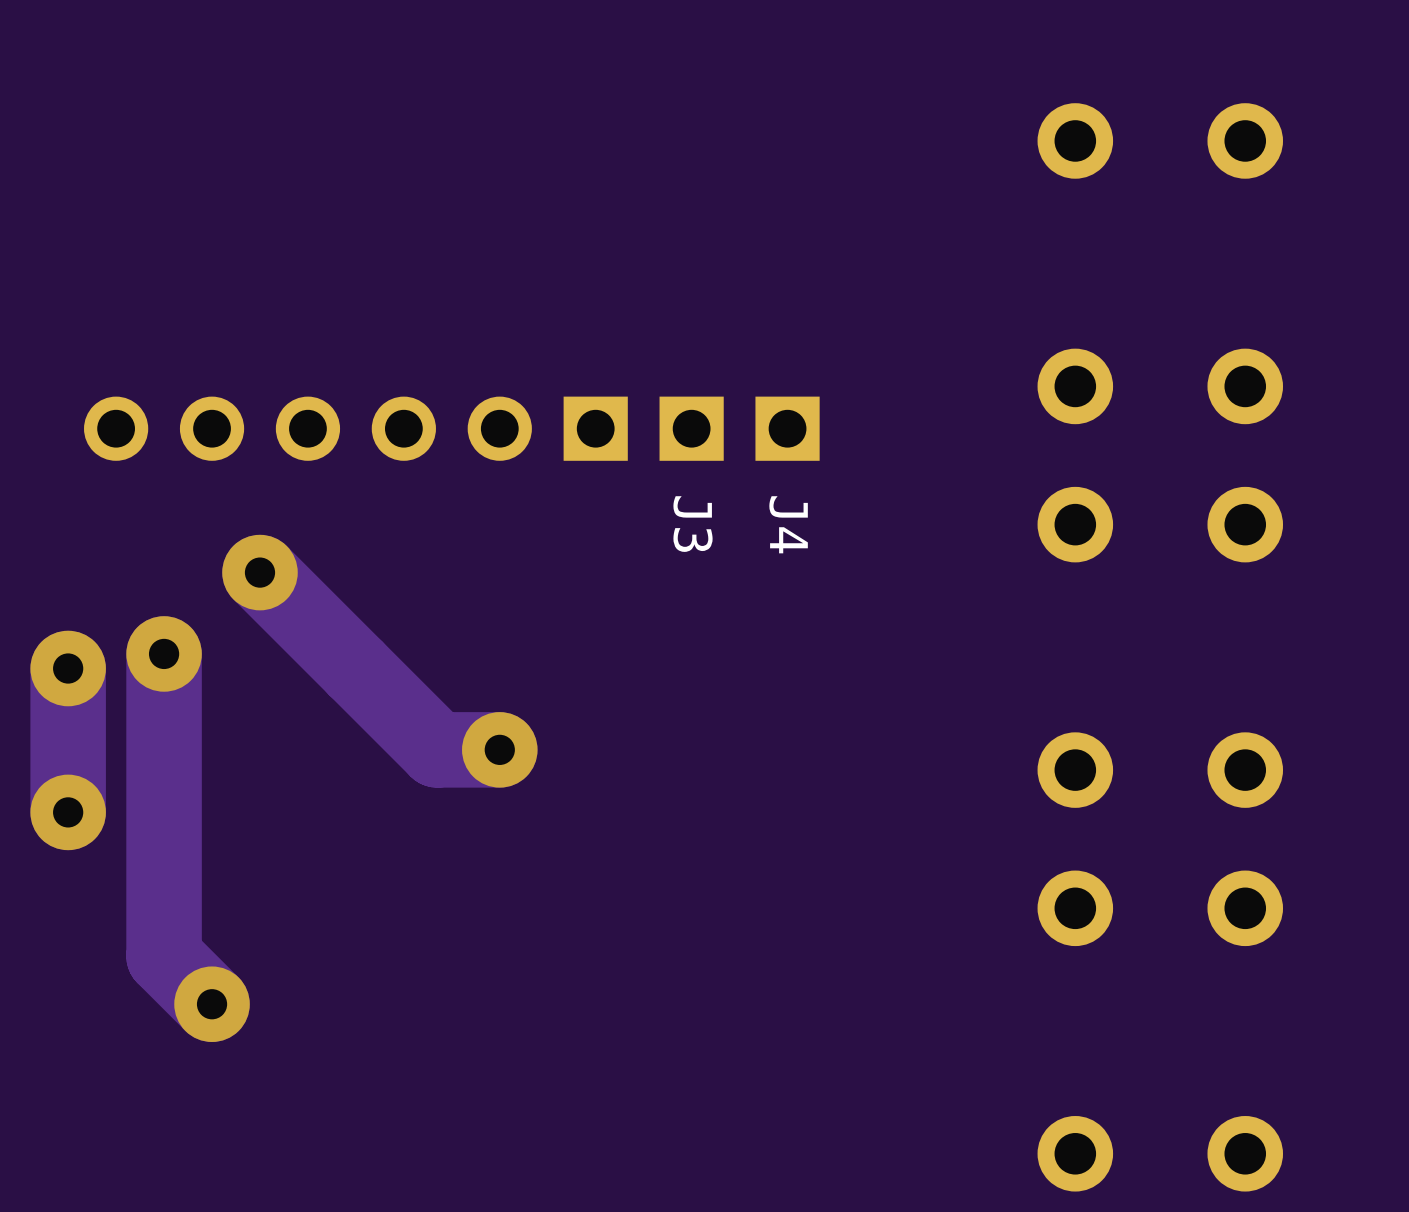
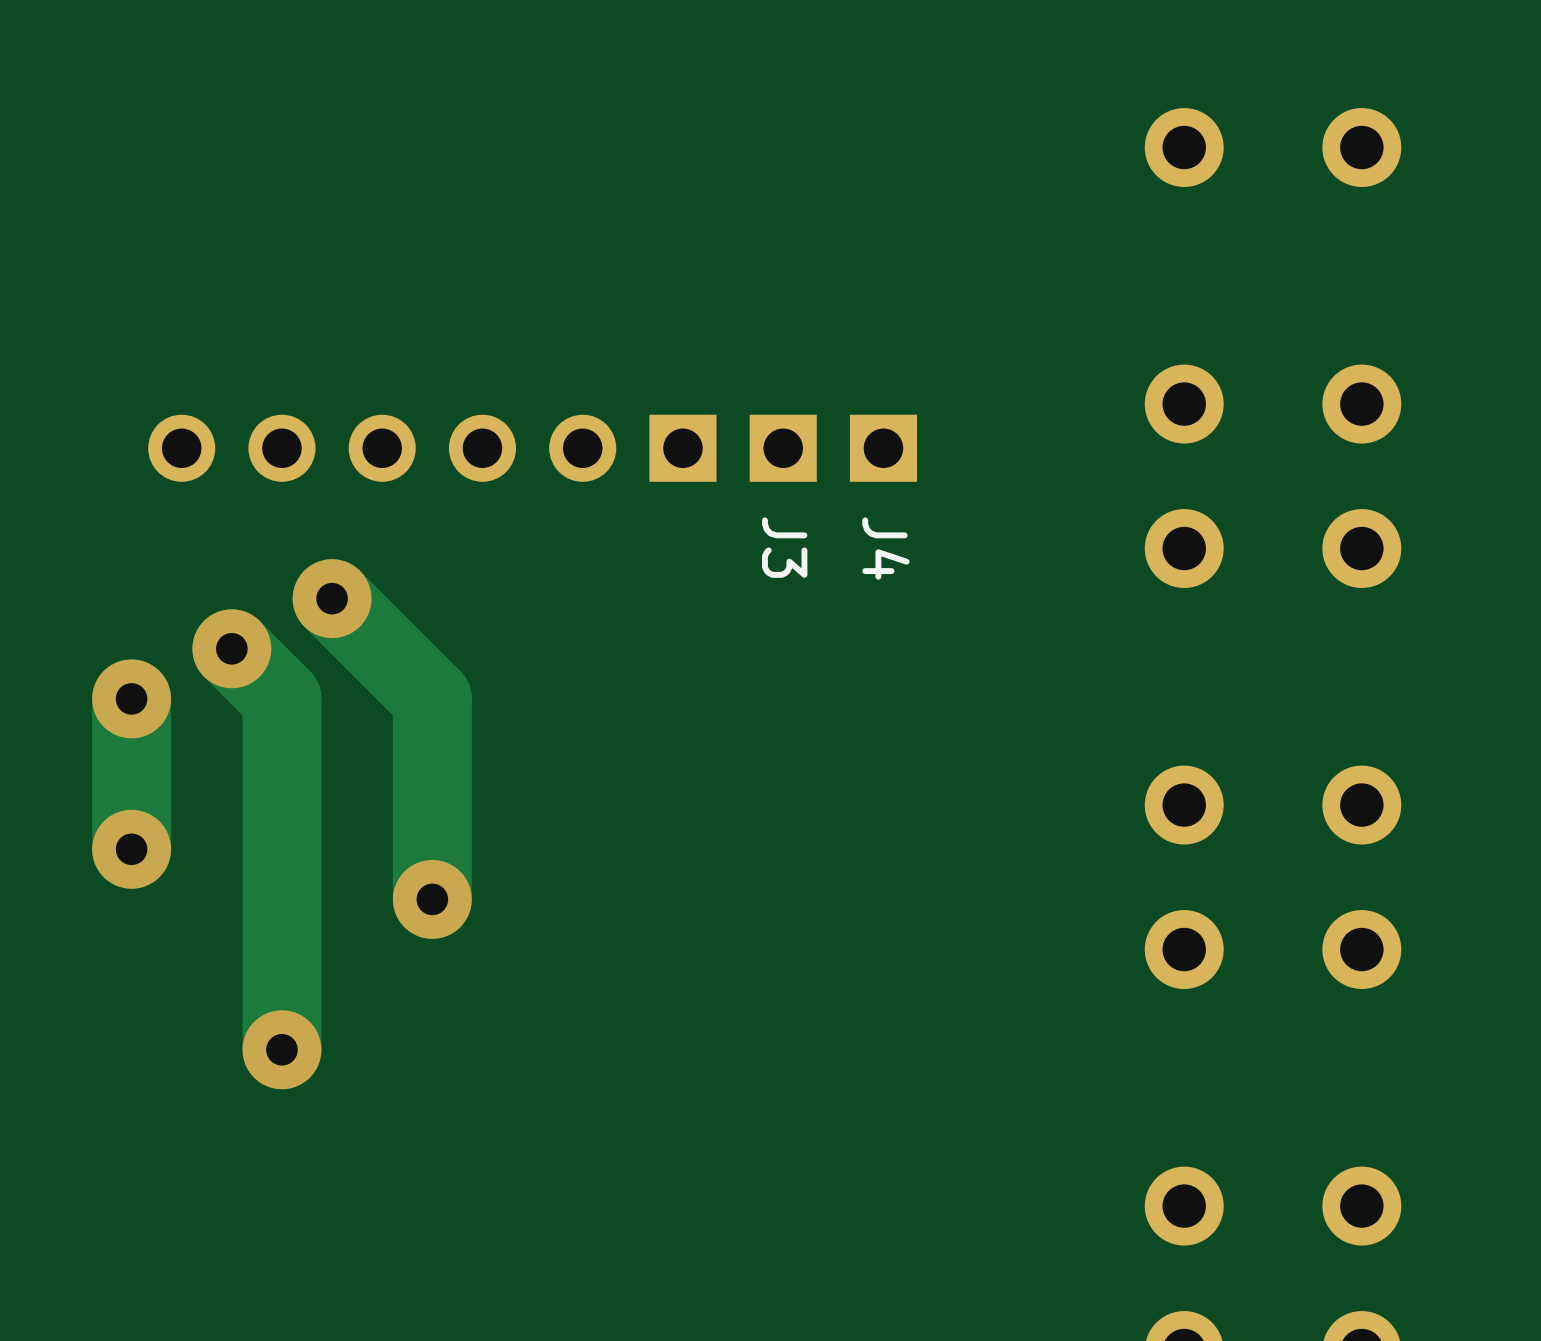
track: (164, 653) (164, 956) (212, 1004) -> (231, 648) (281, 698) (281, 1049)
via position: (164, 653) -> (231, 648)
track: (355, 668) (437, 749) (499, 749) -> (432, 698) (432, 899)
via: (499, 749) -> none
via: none -> (432, 899)

